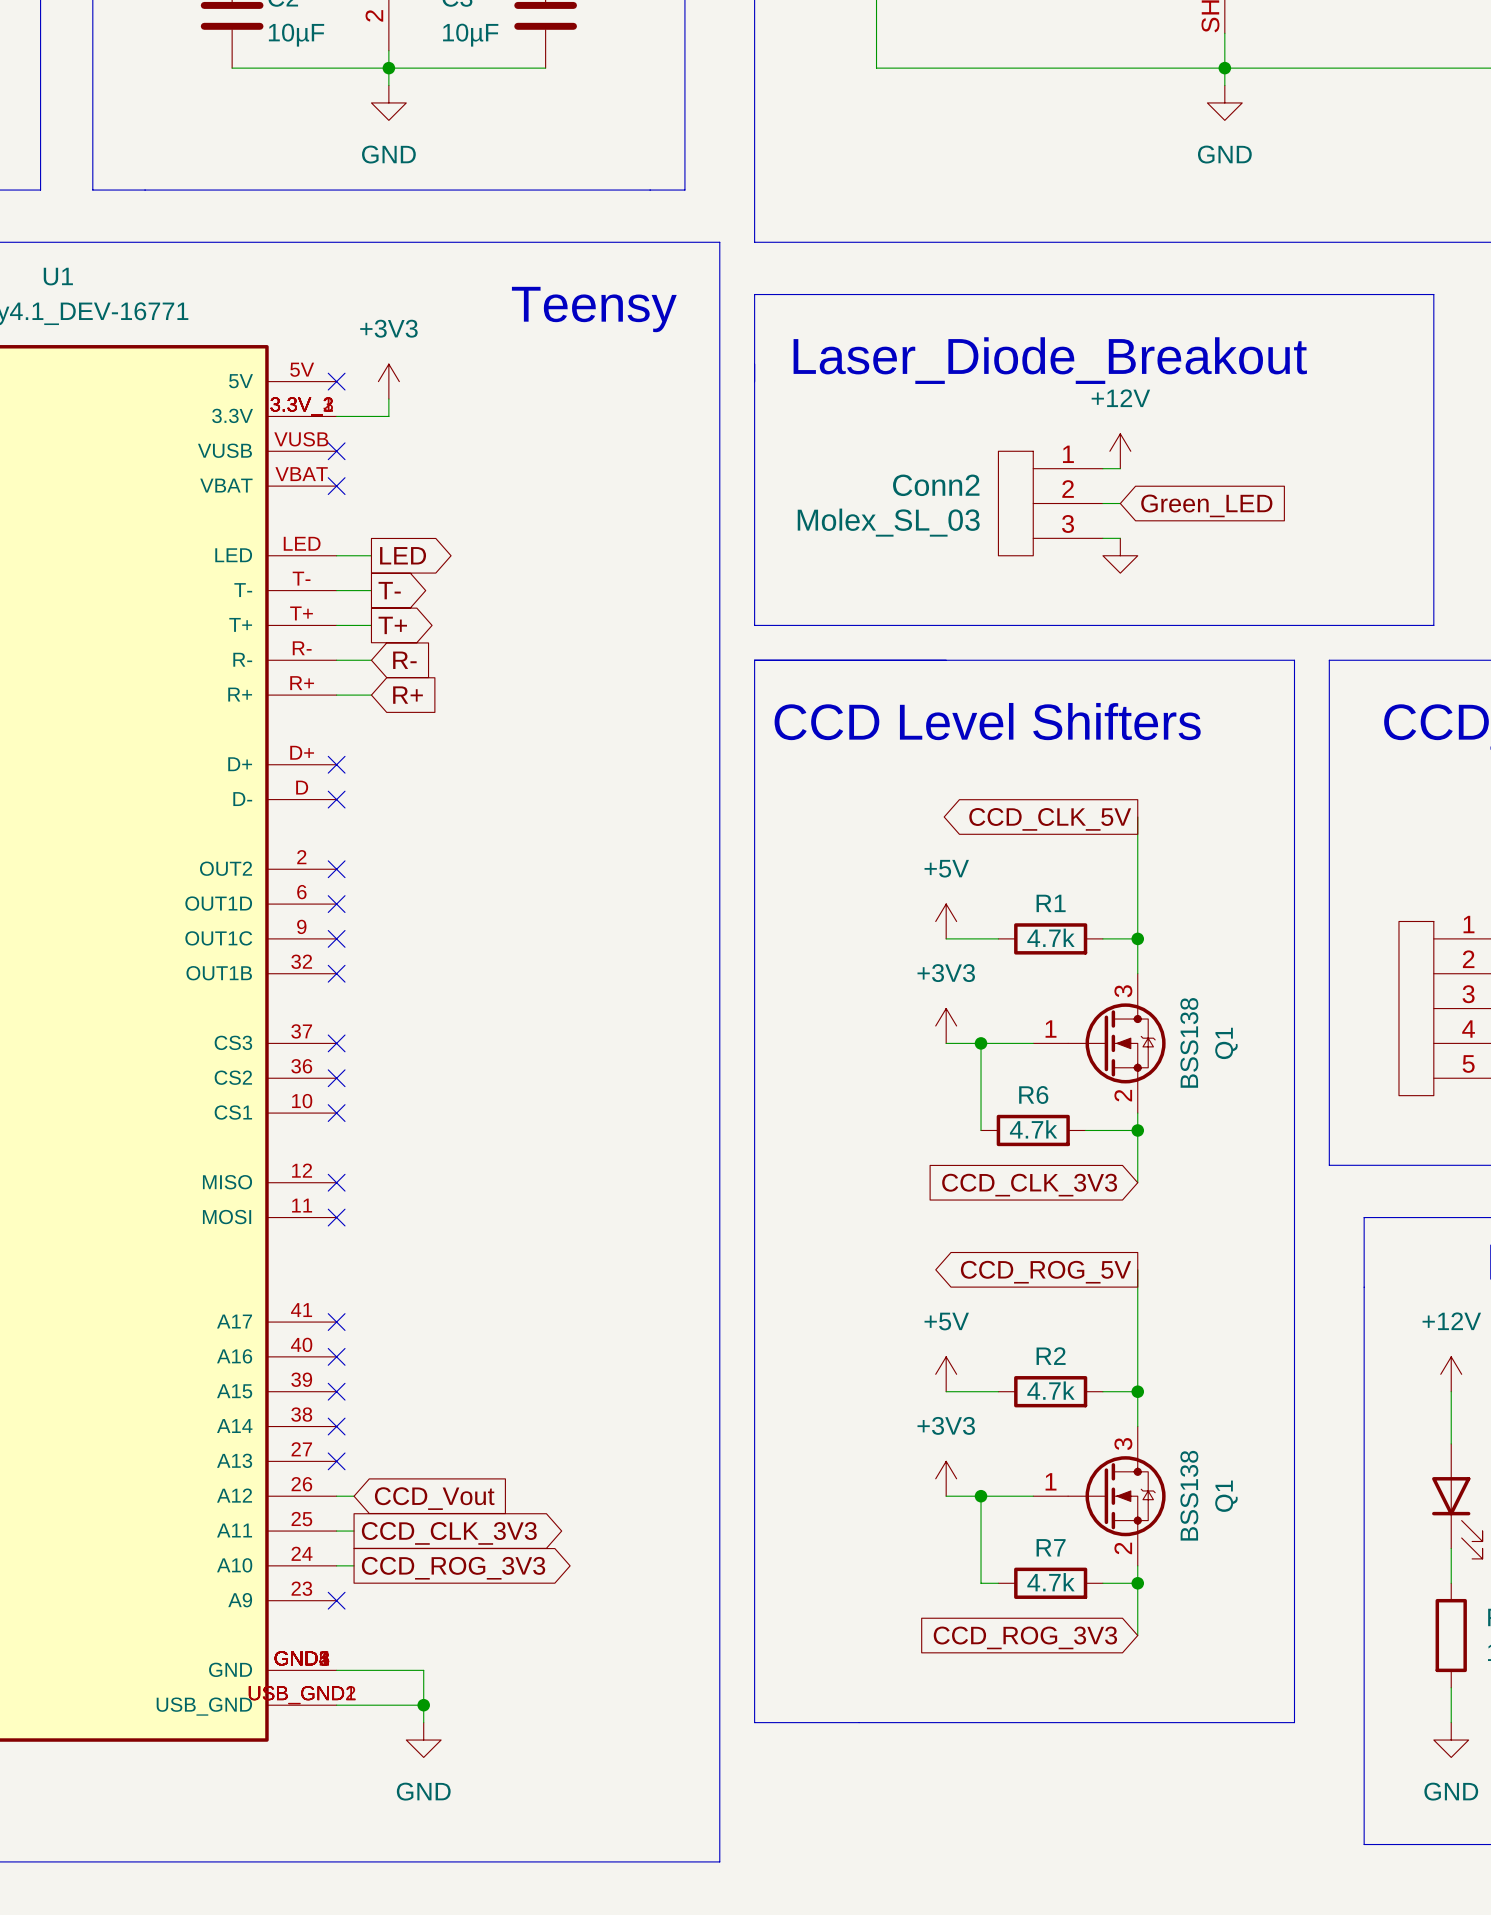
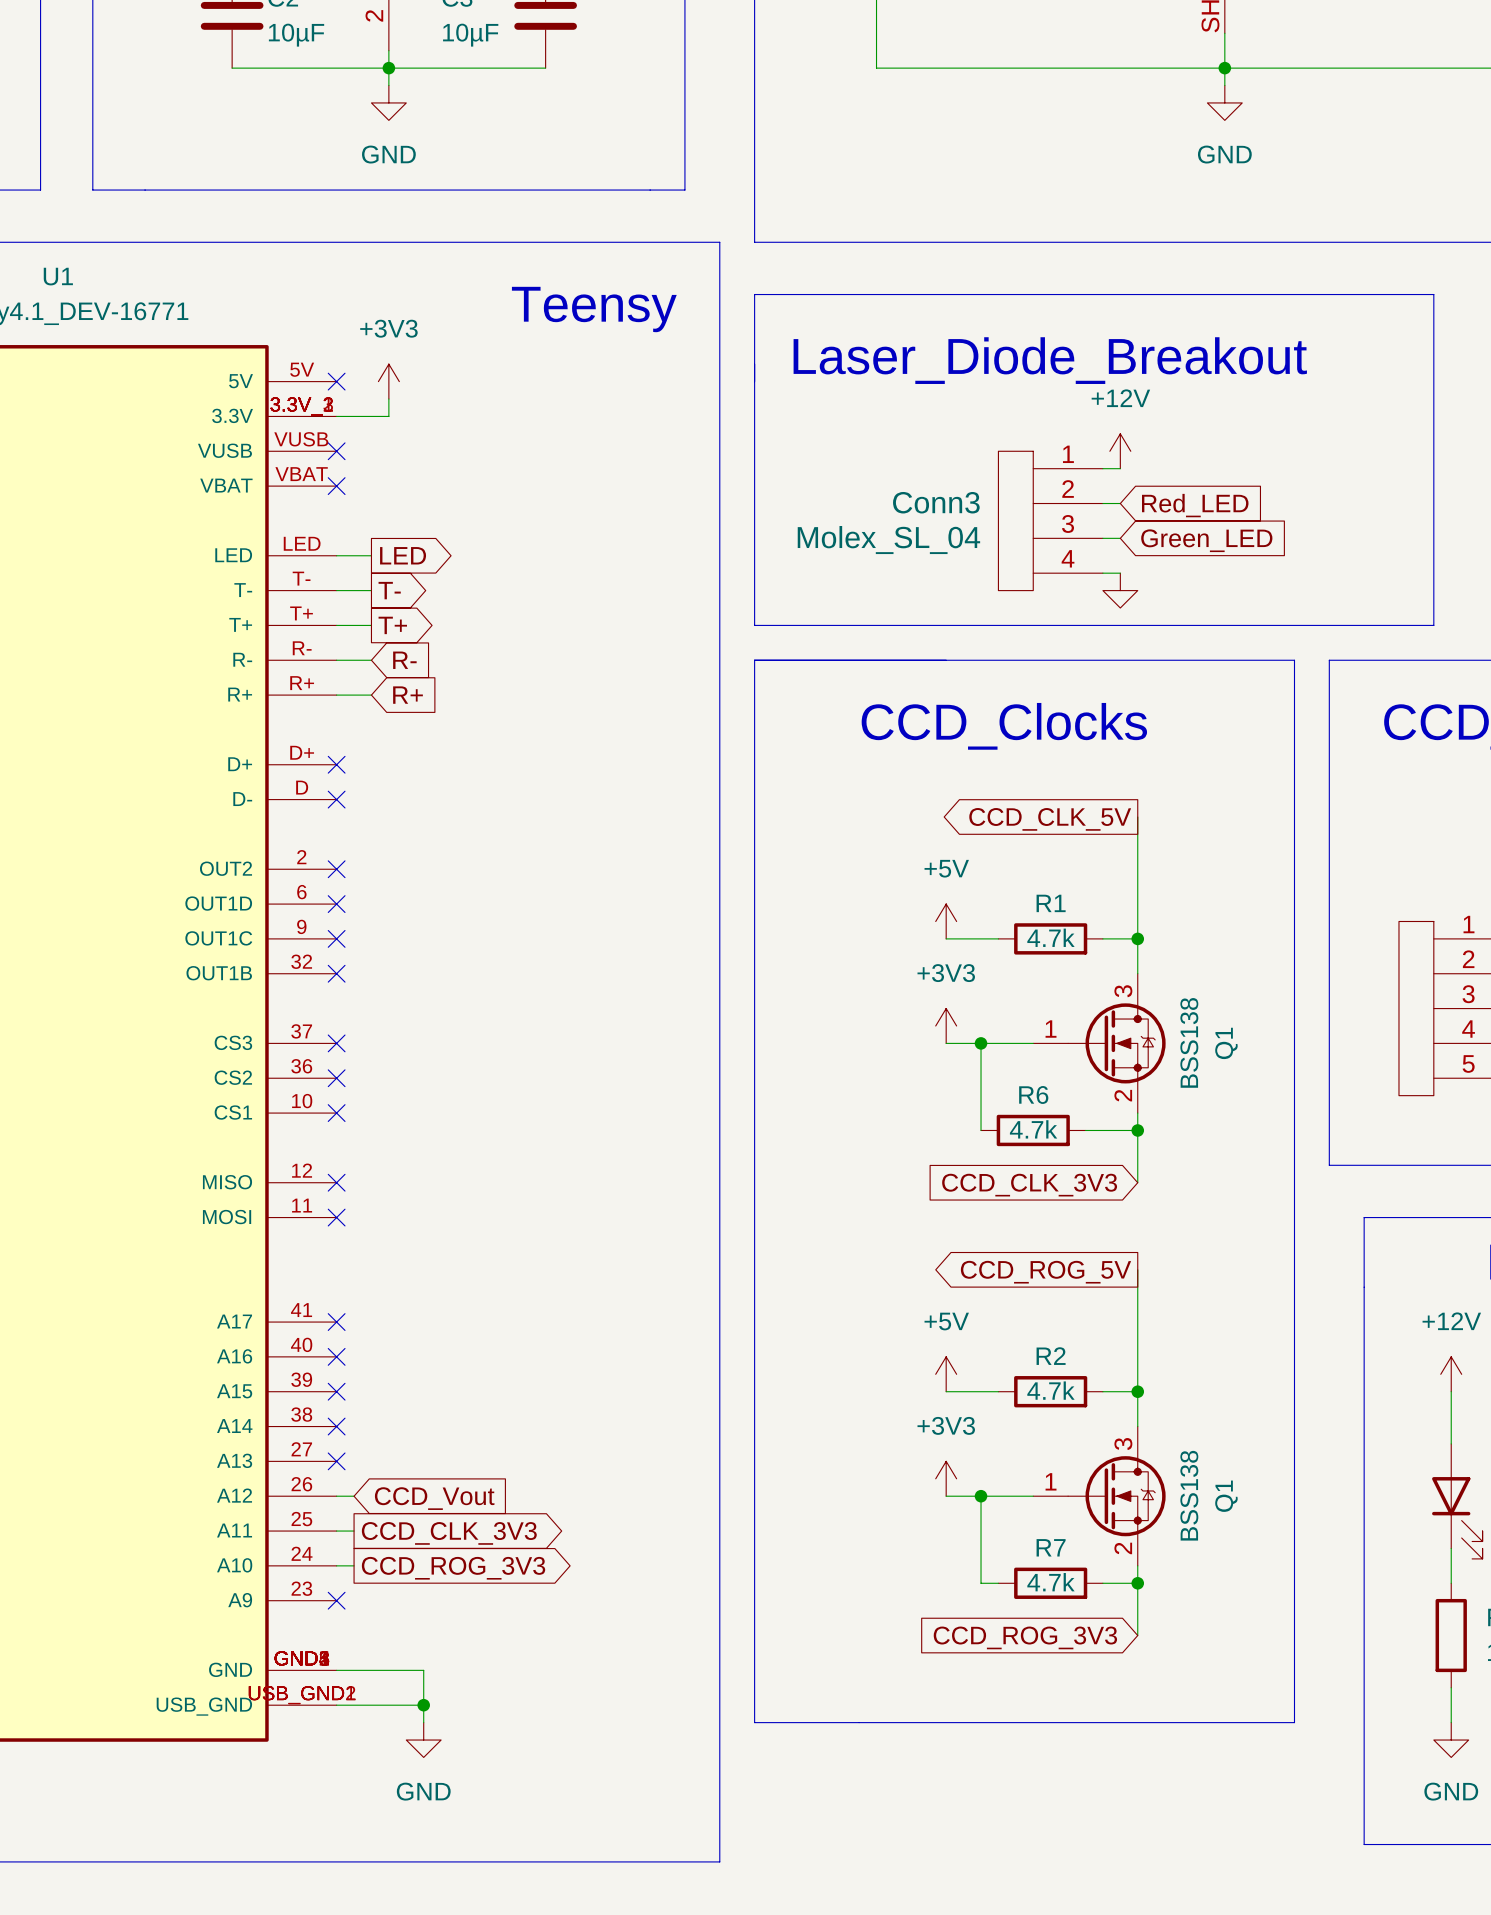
Conn2: Molex_SL_03 (1050, 503) -> none
global label: Green_LED (1206, 505) -> Red_LED (1195, 505)
Conn3: none -> Molex_SL_04 (1050, 520)
global label: none -> Green_LED (1206, 540)
power symbol position: (1120, 555) -> (1120, 590)
wire: none -> (1102, 573) (1120, 573)
text: CCD Level Shifters (987, 721) -> none
text: none -> CCD_Clocks (1004, 726)

